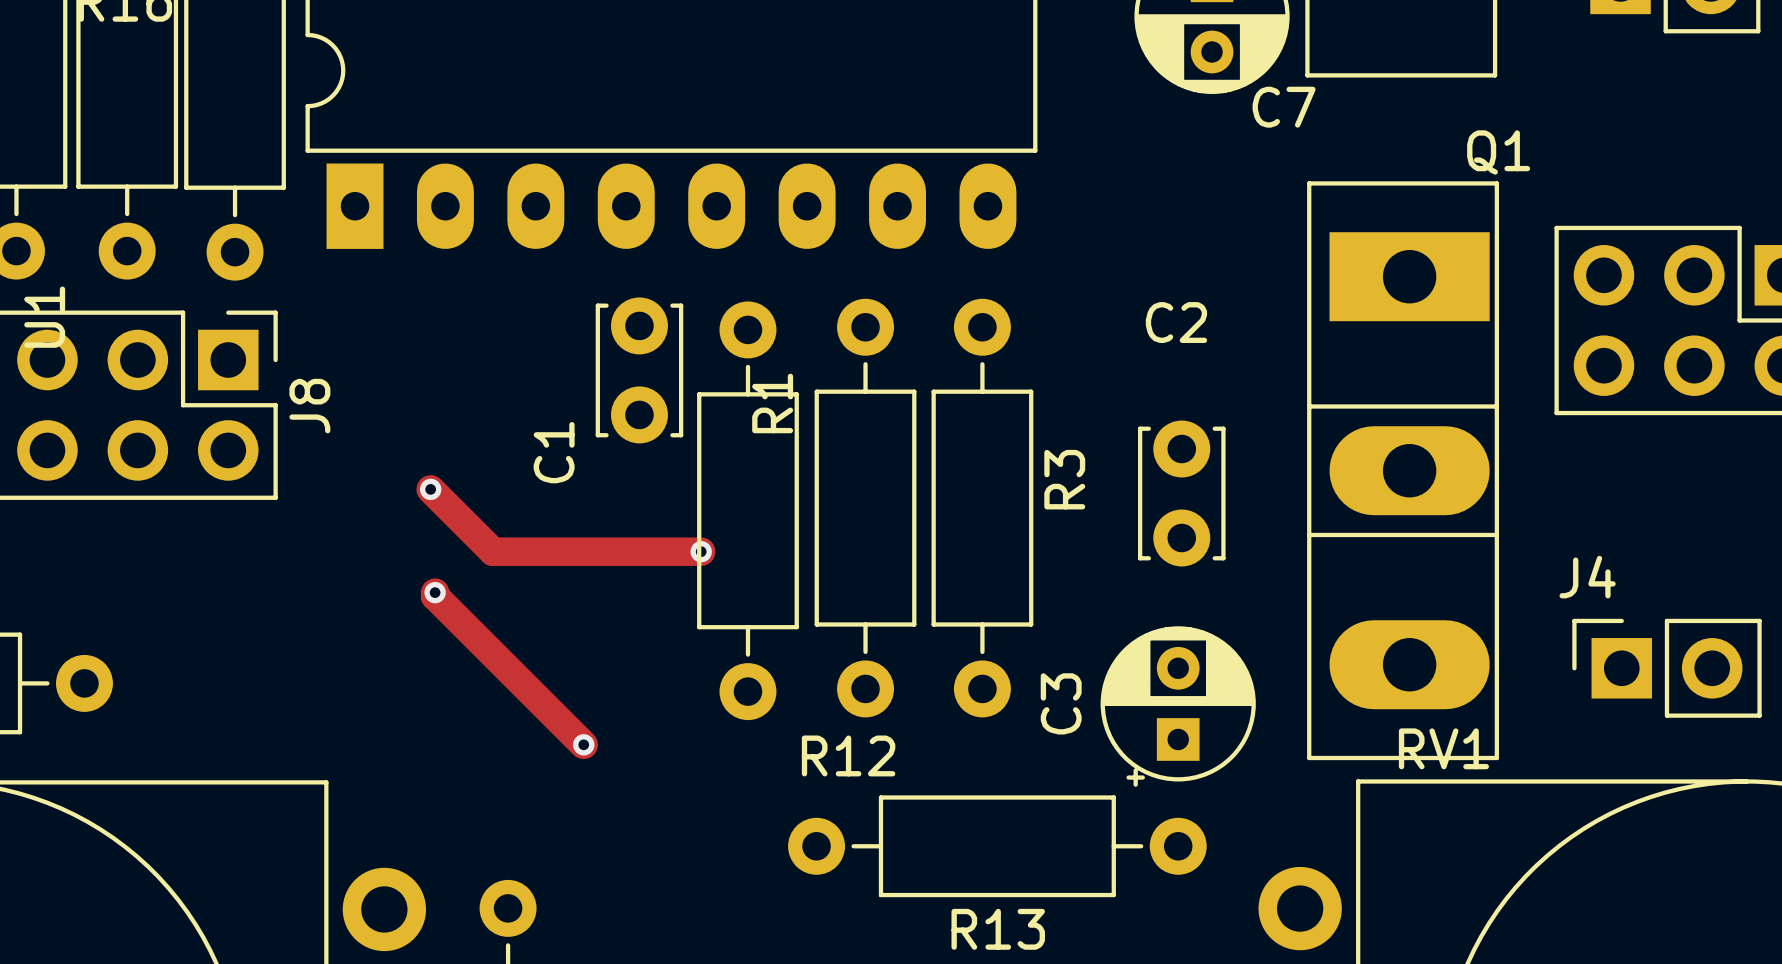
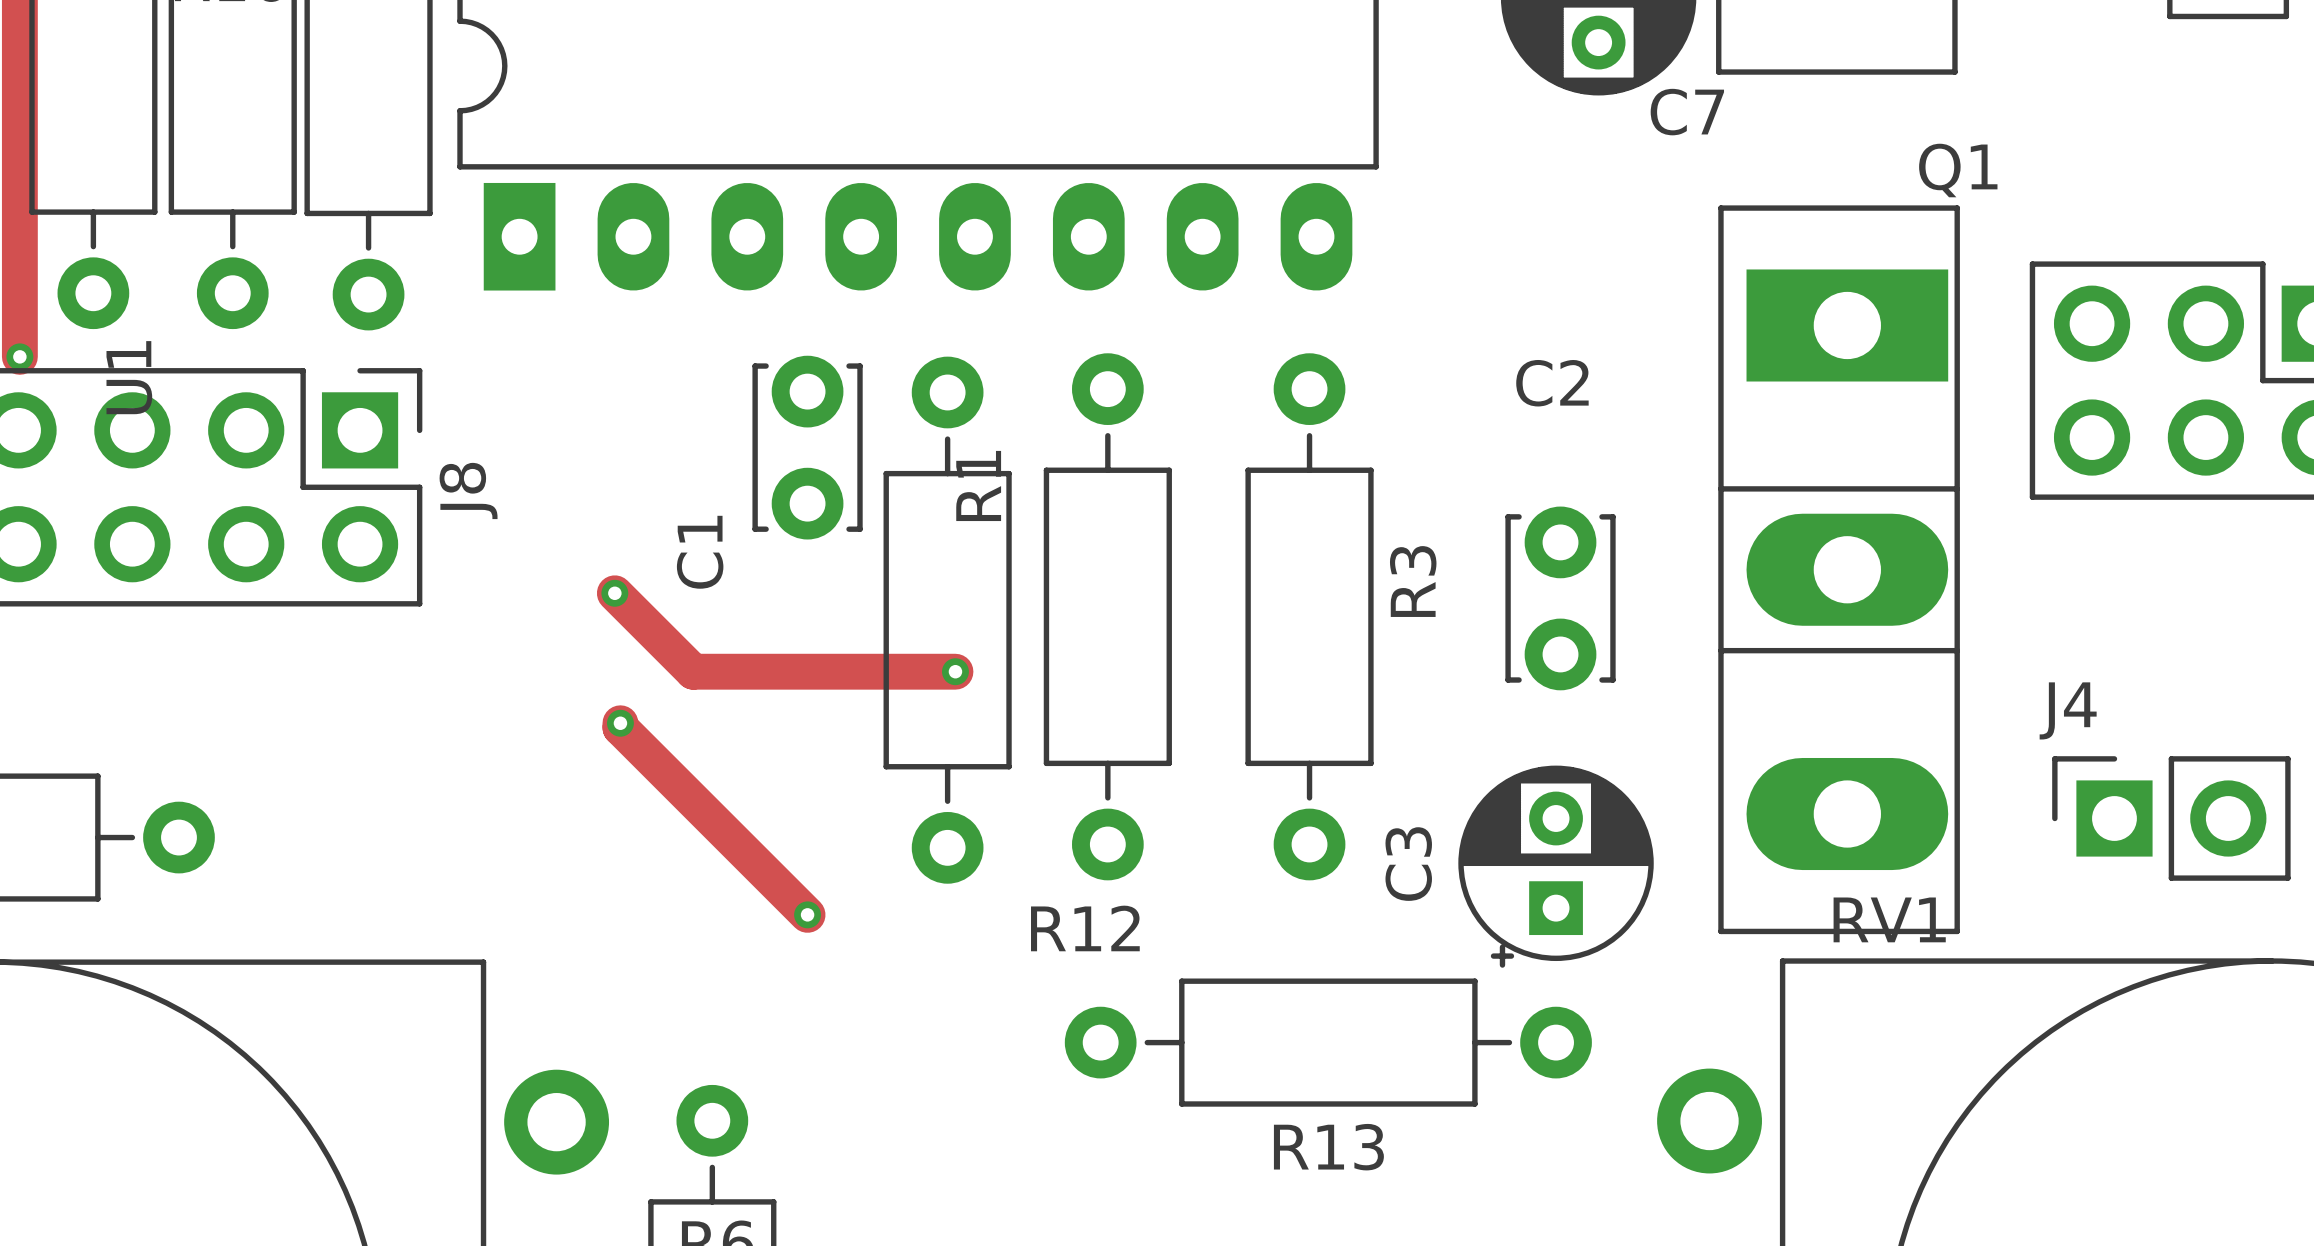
C1 position: (639, 370) -> (807, 447)
R12 position: (865, 508) -> (1107, 616)
R1 position: (747, 510) -> (947, 620)

